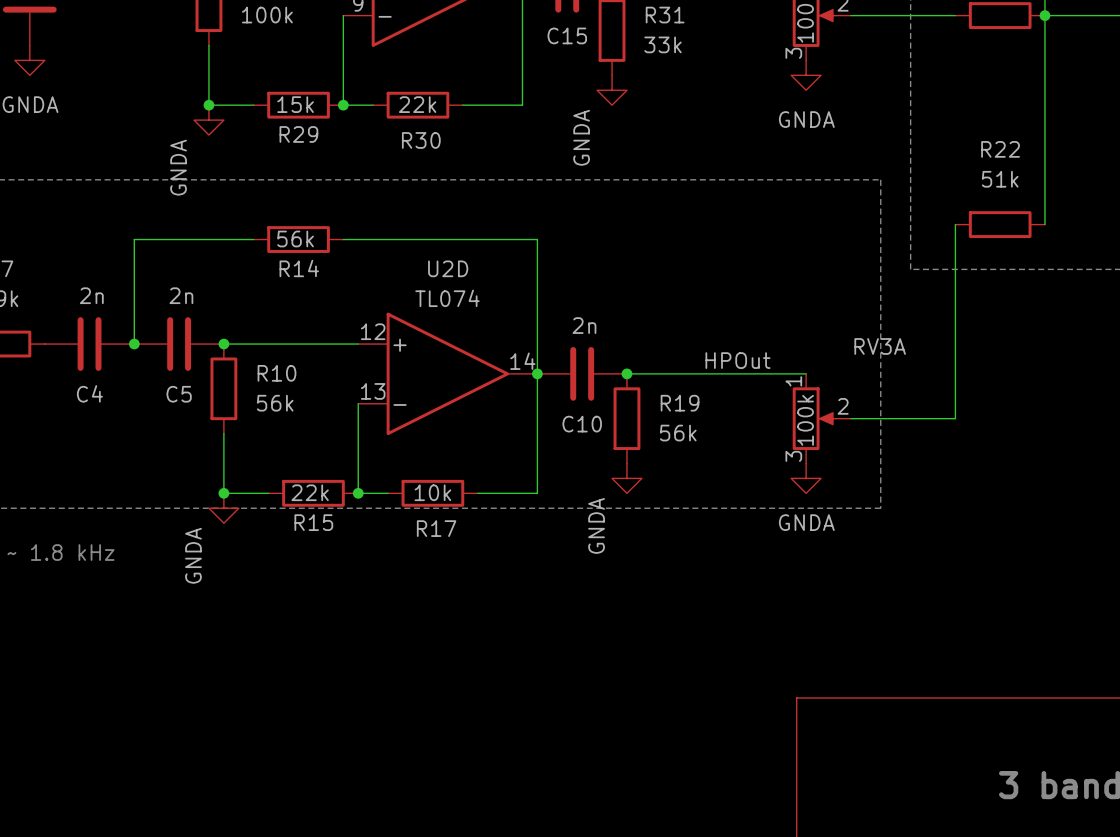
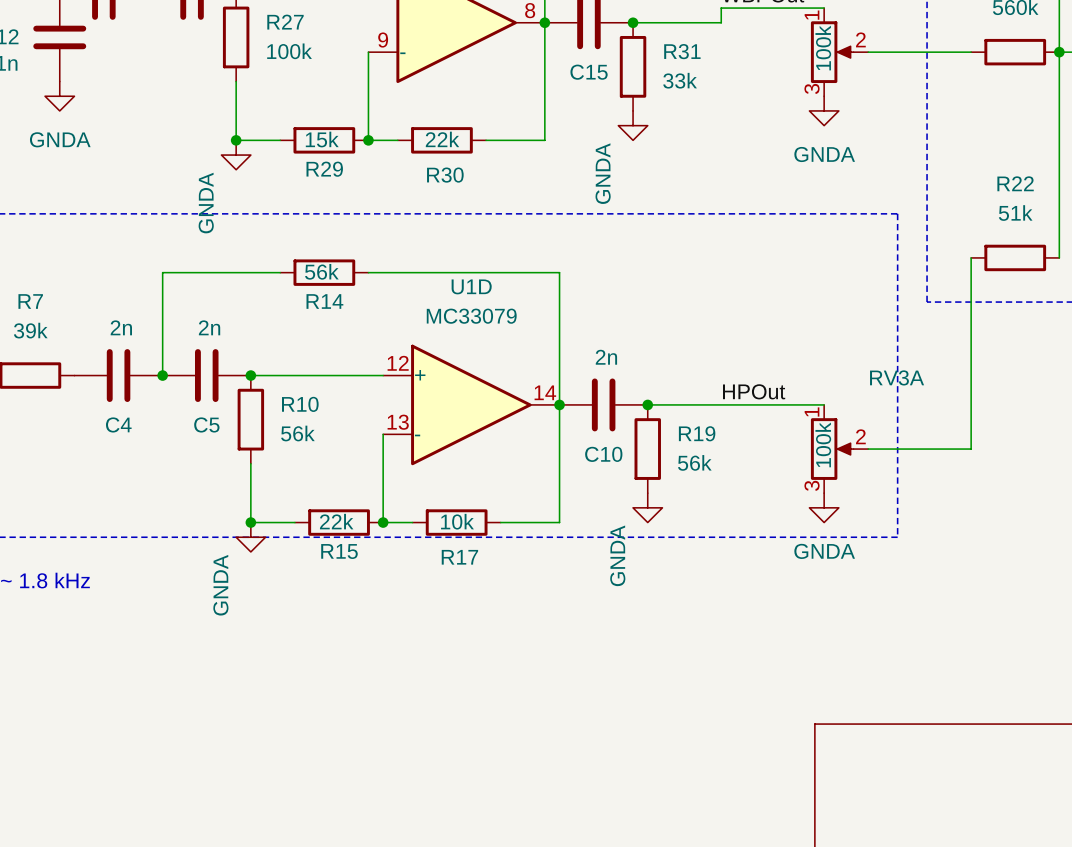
U2D name: U2D (448, 268) -> U1D (471, 286)
U2D value: TL074 (447, 298) -> MC33079 (471, 316)

